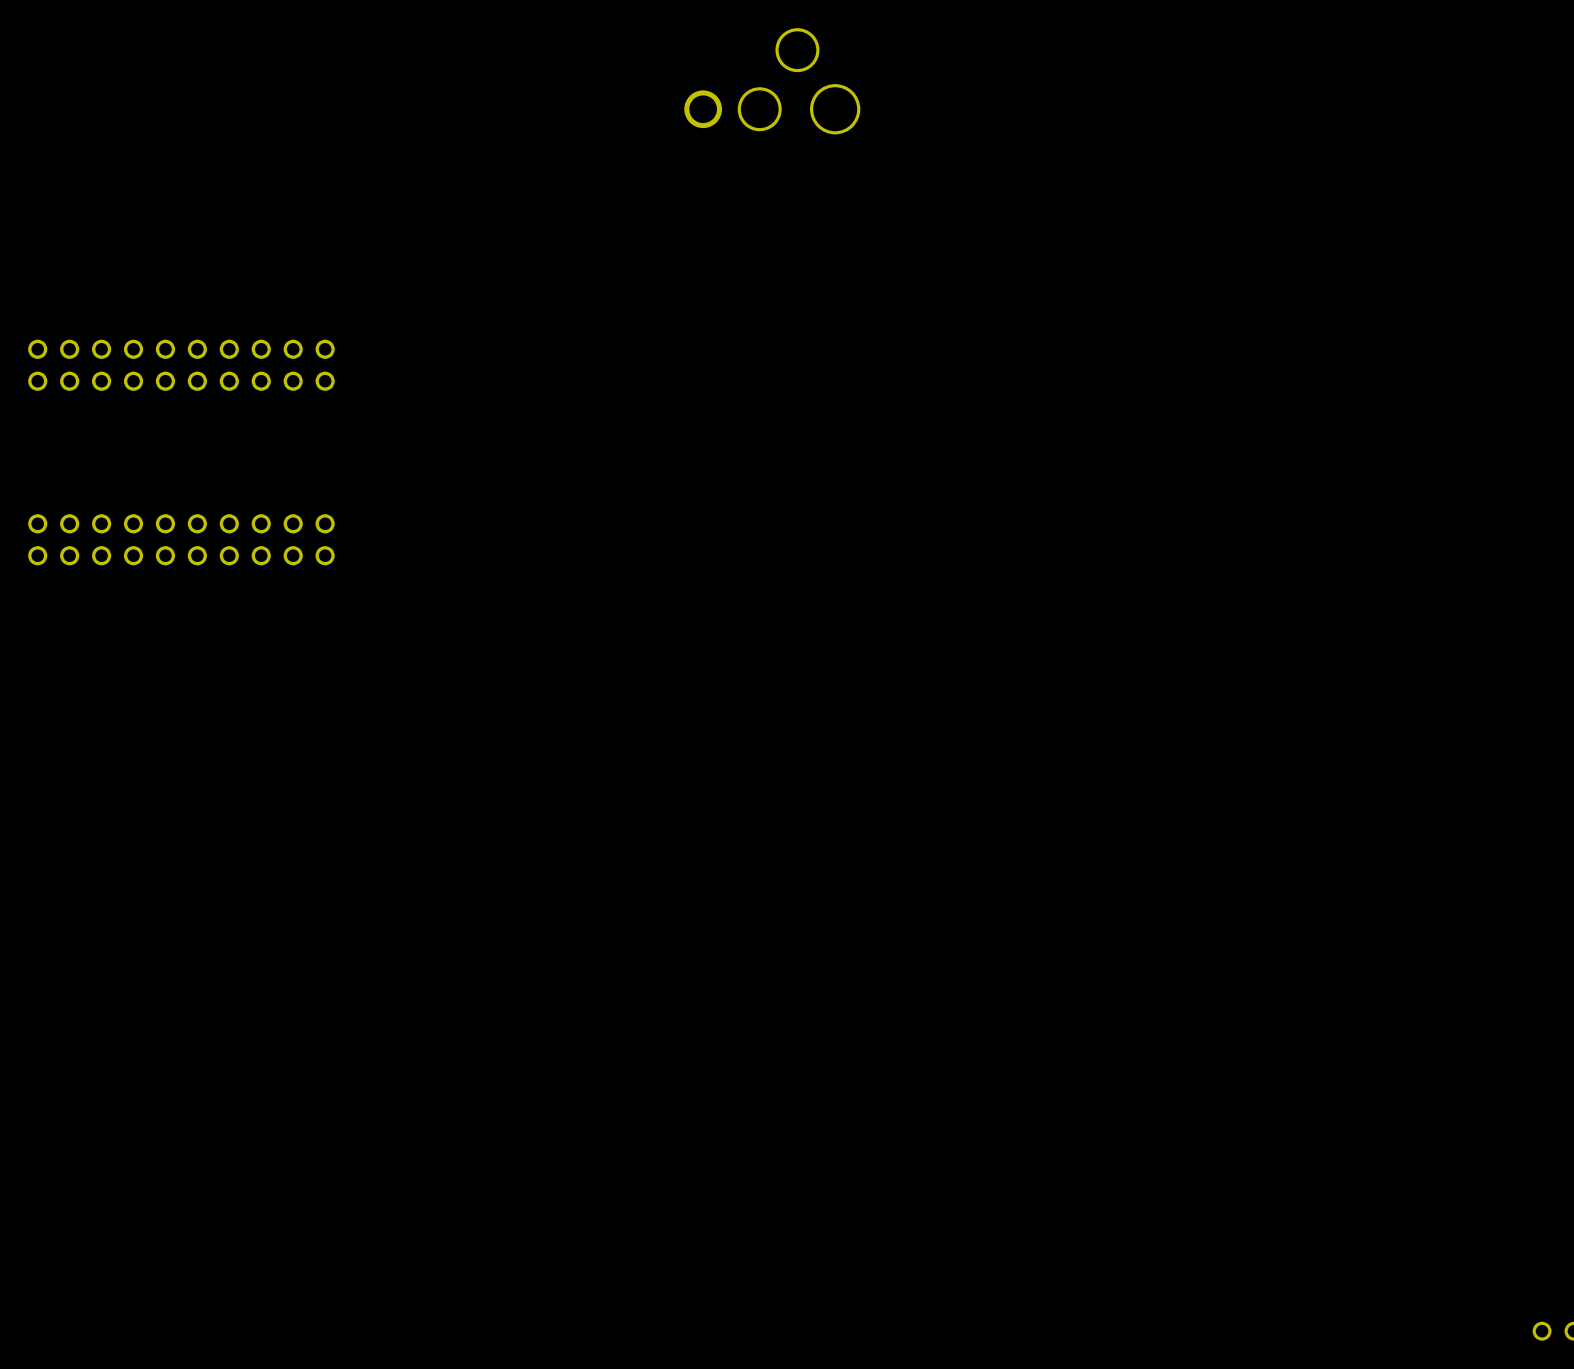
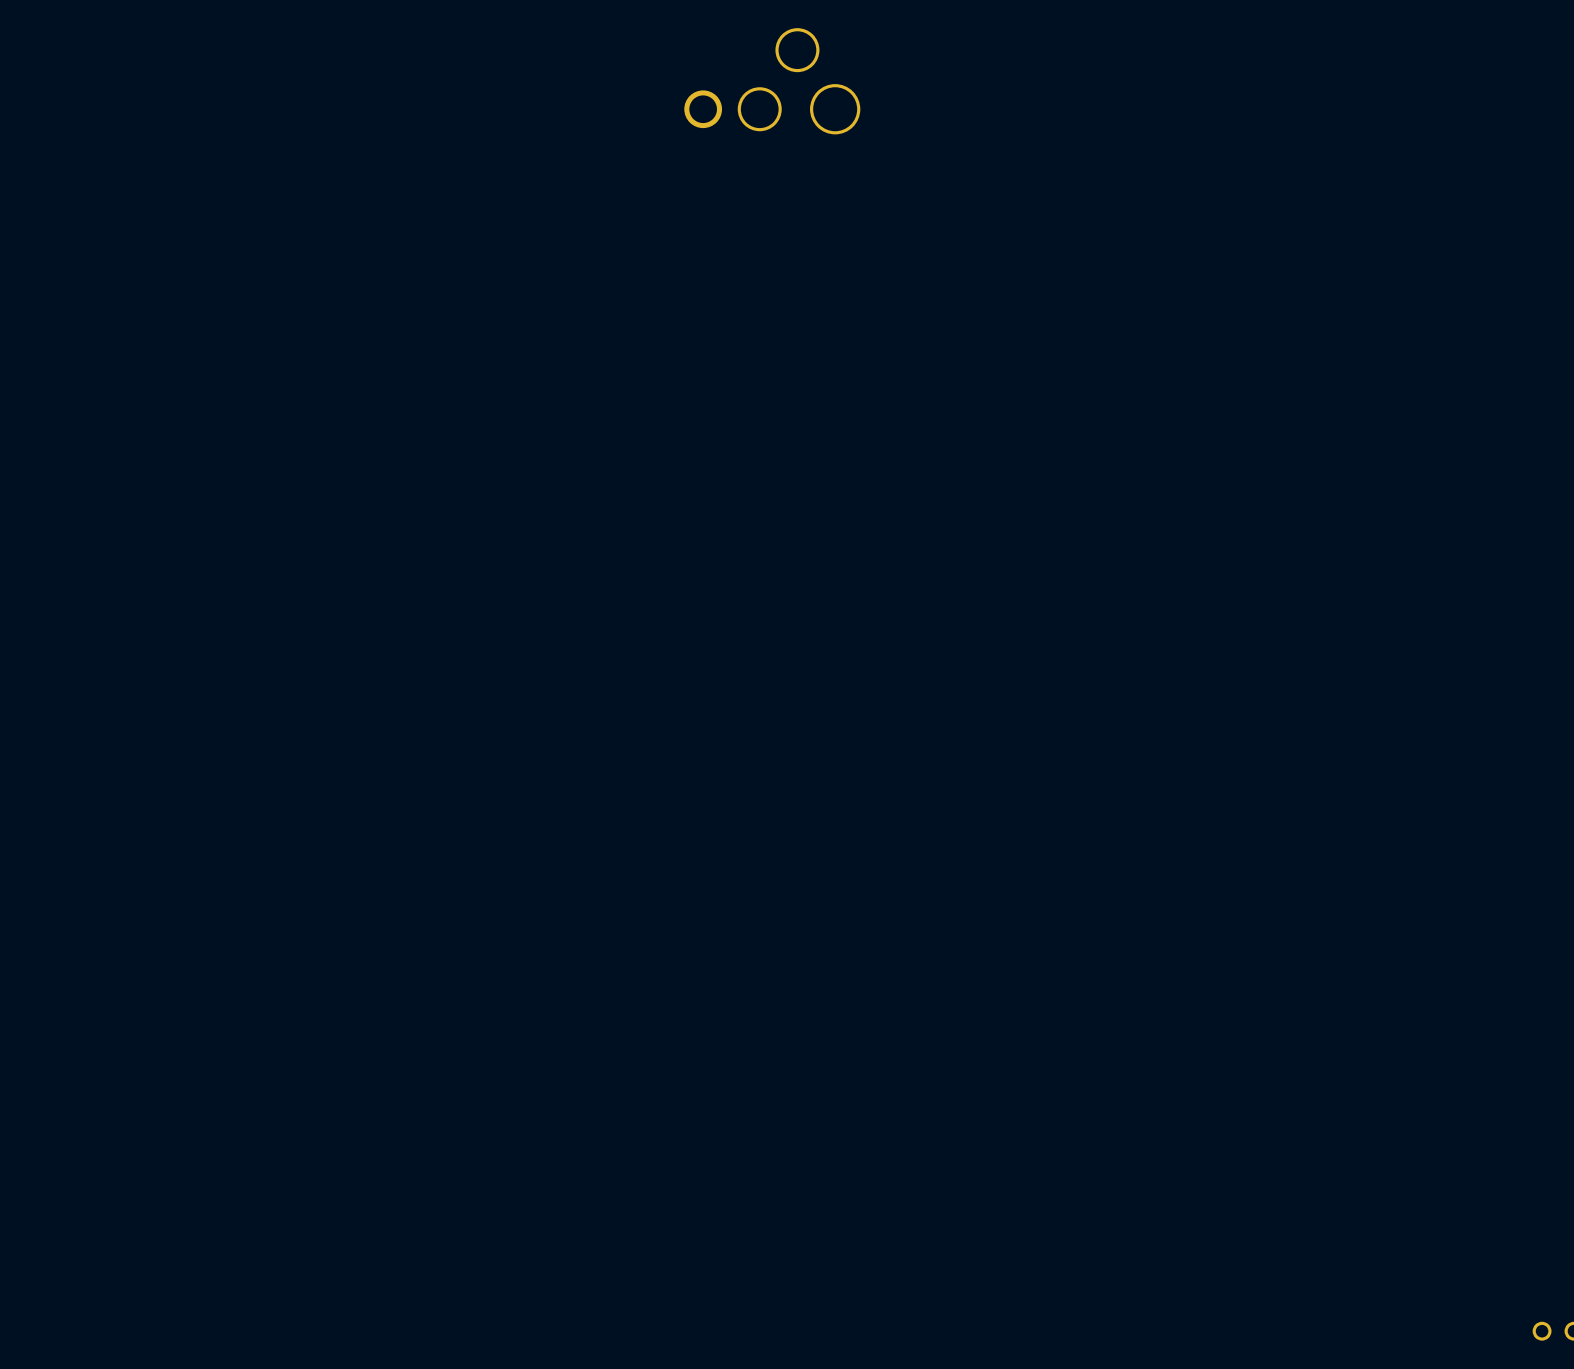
part: (181, 365) -> none
part: (181, 539) -> none

